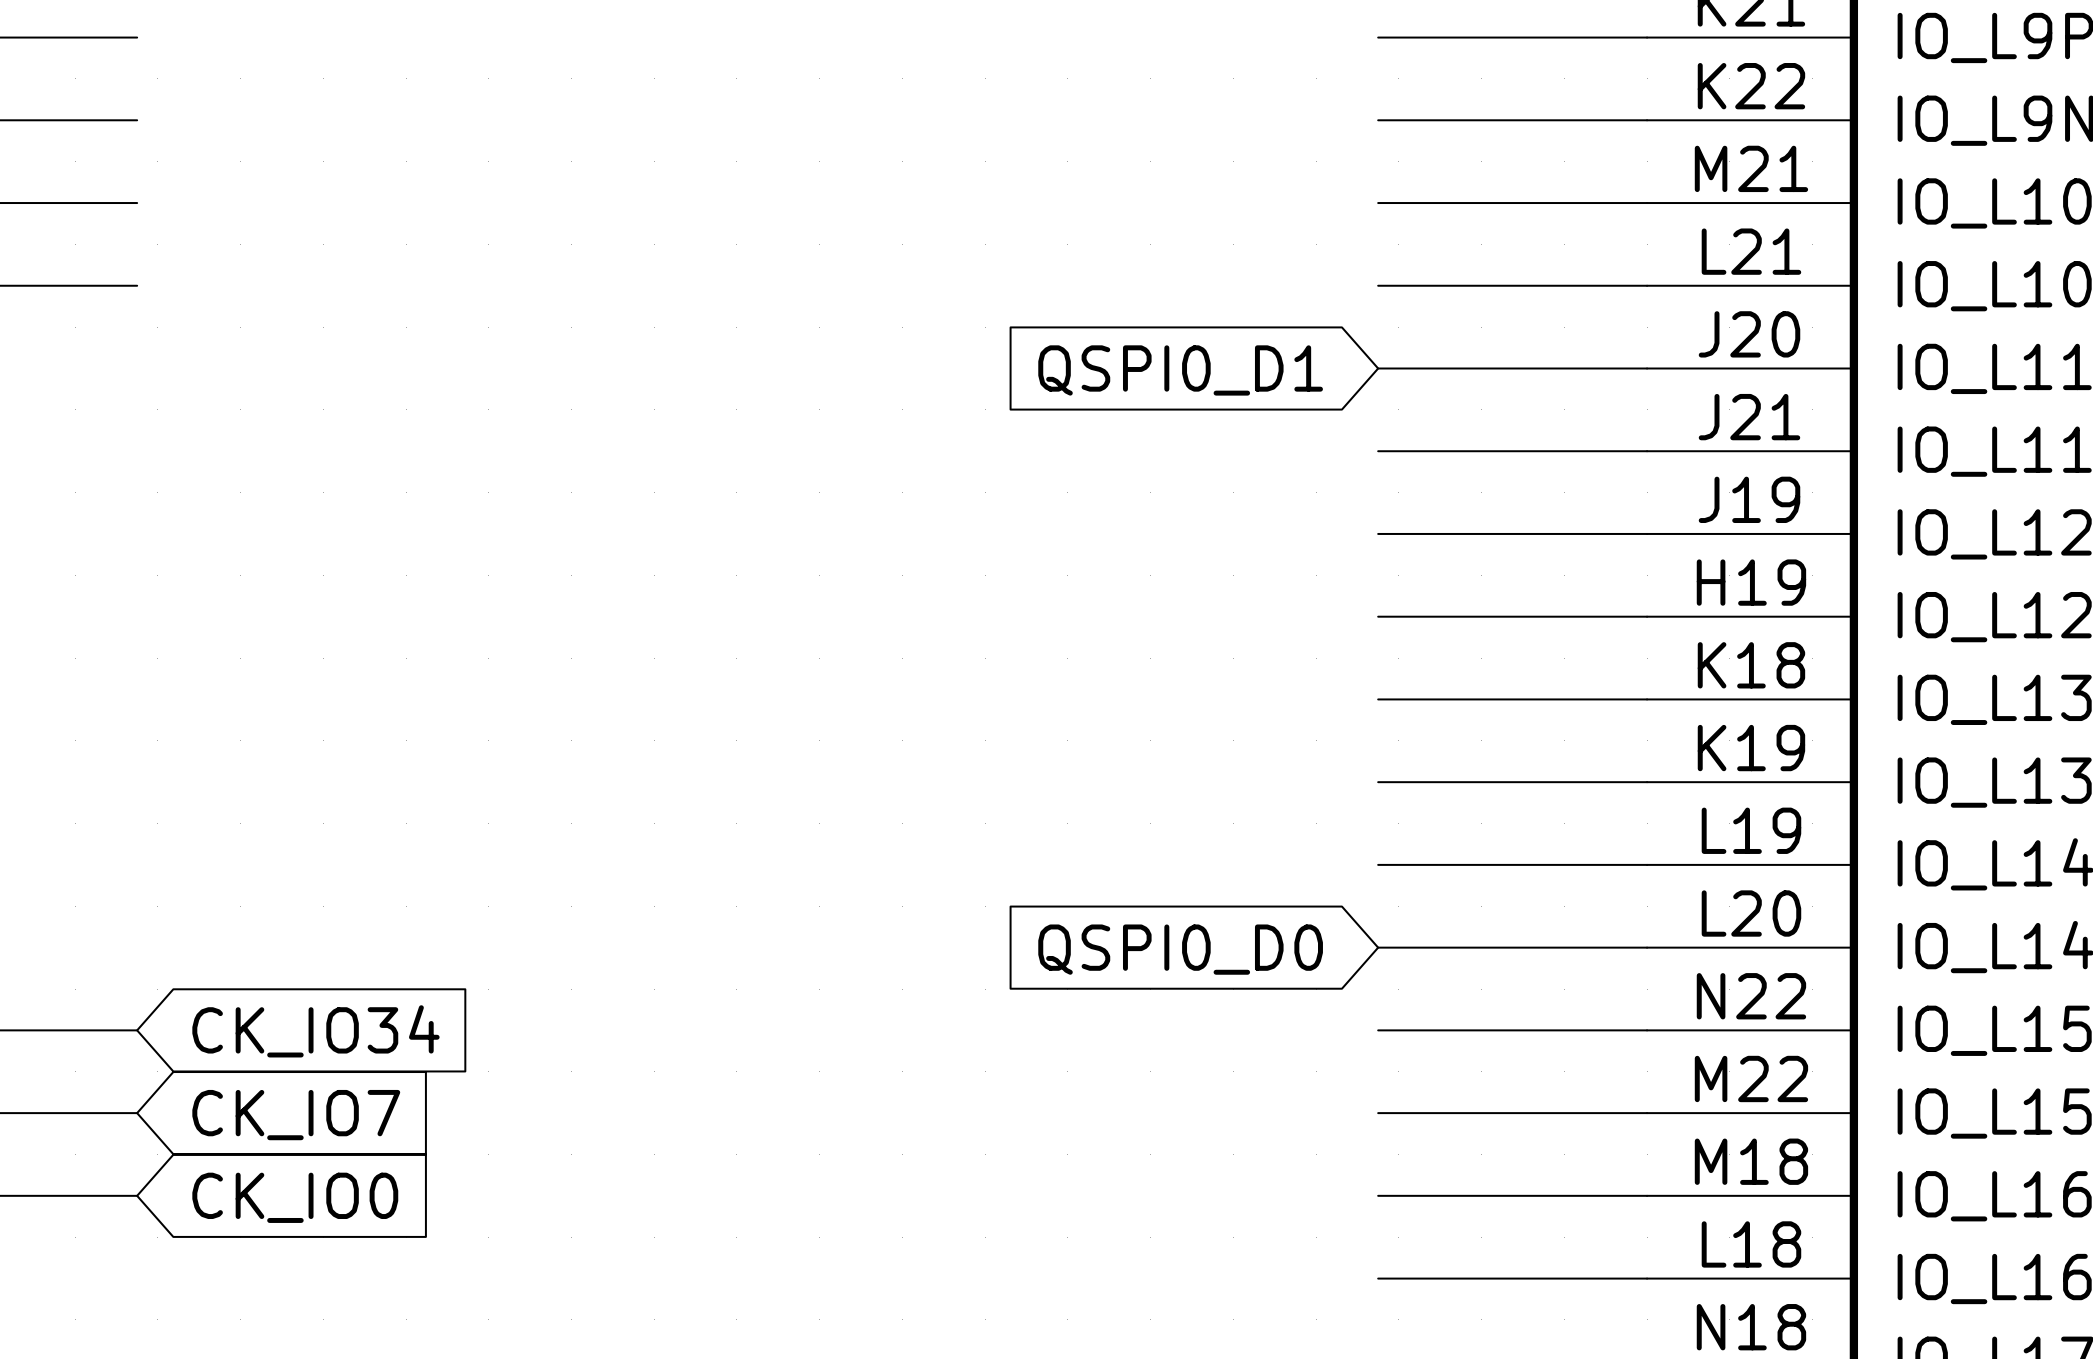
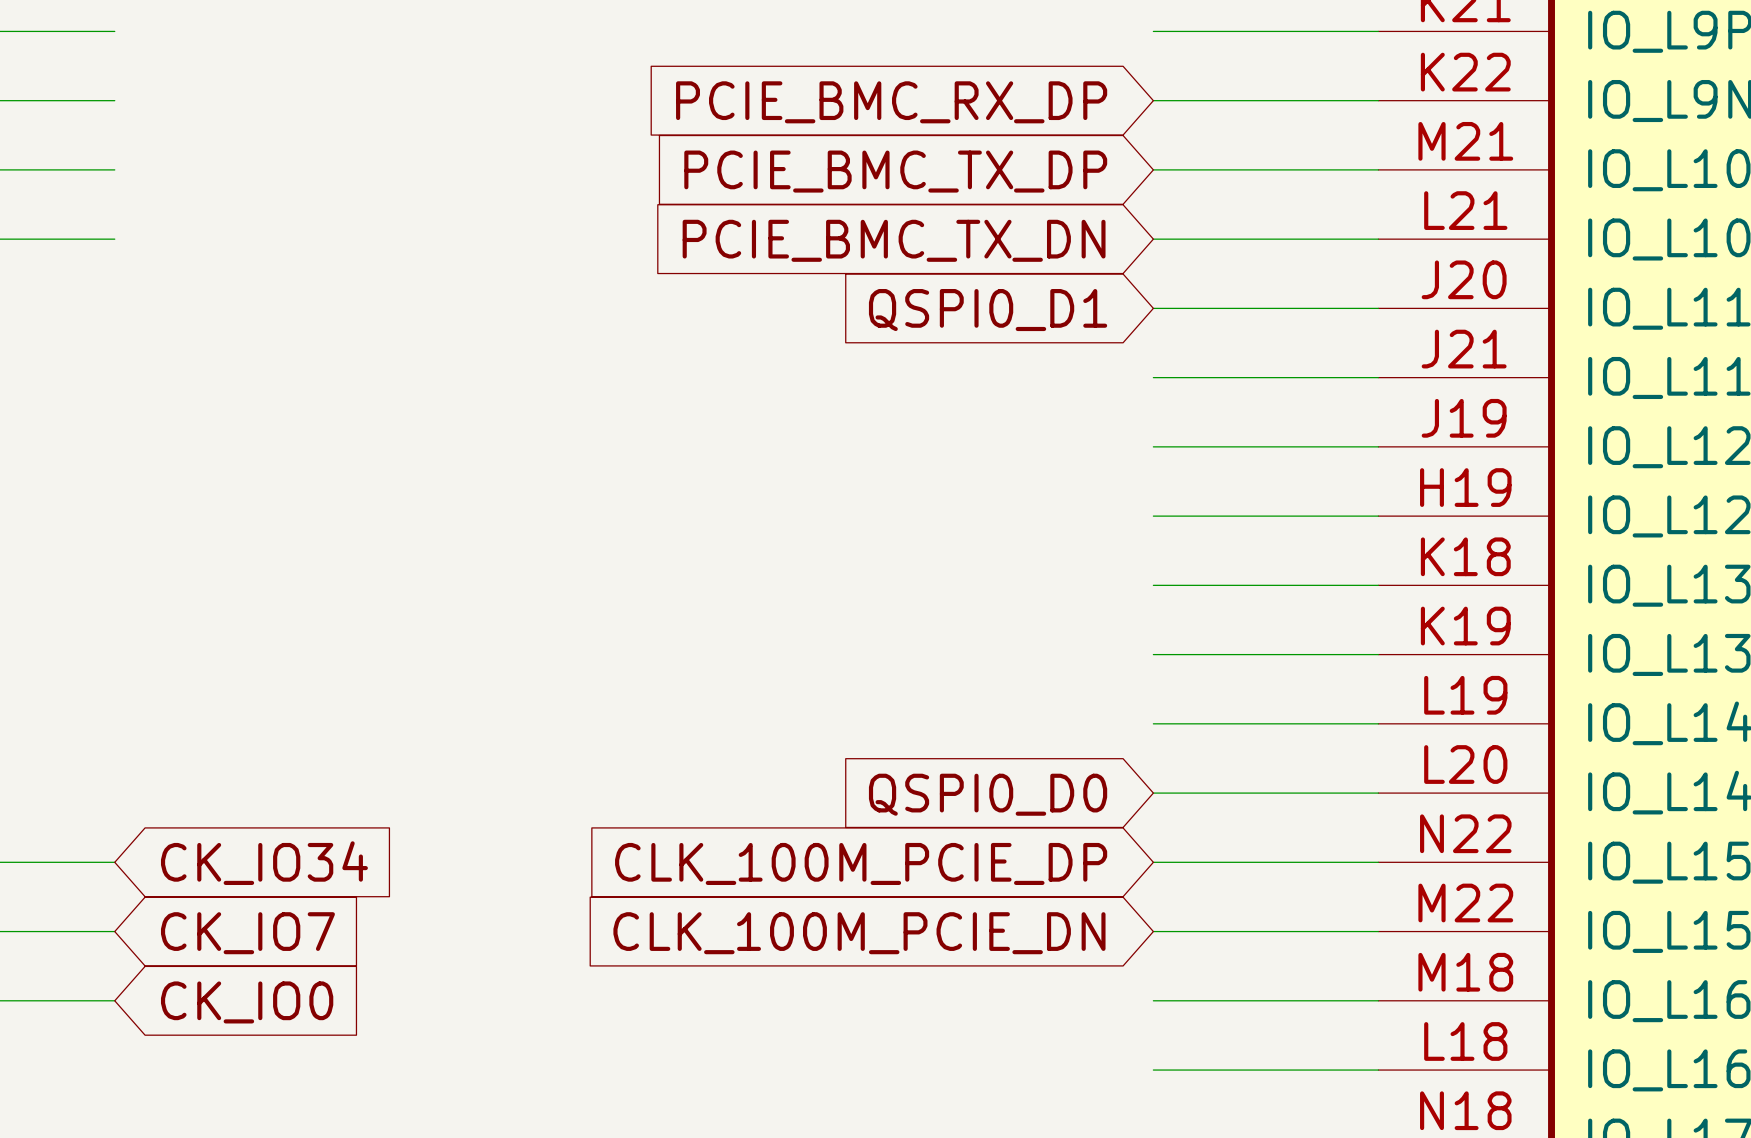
global label: none -> PCIE_BMC_RX_DP (891, 102)
global label: none -> PCIE_BMC_TX_DP (895, 171)
global label: none -> PCIE_BMC_TX_DN (894, 240)
global label: none -> CLK_100M_PCIE_DP (861, 863)
global label: none -> CLK_100M_PCIE_DN (859, 933)

